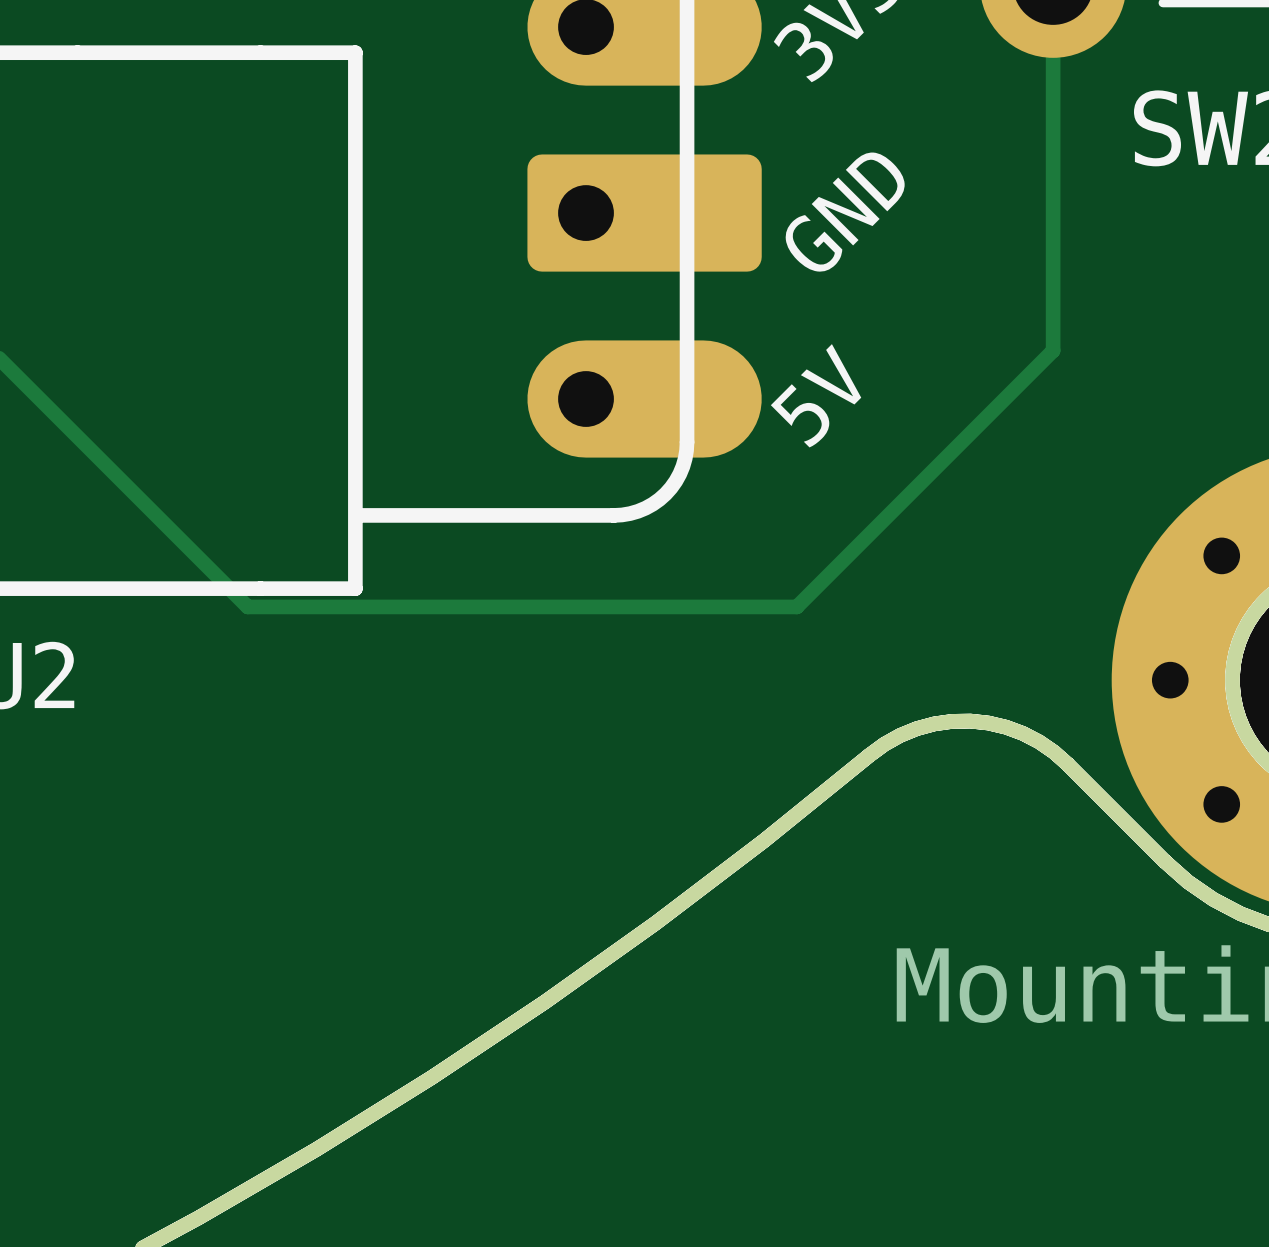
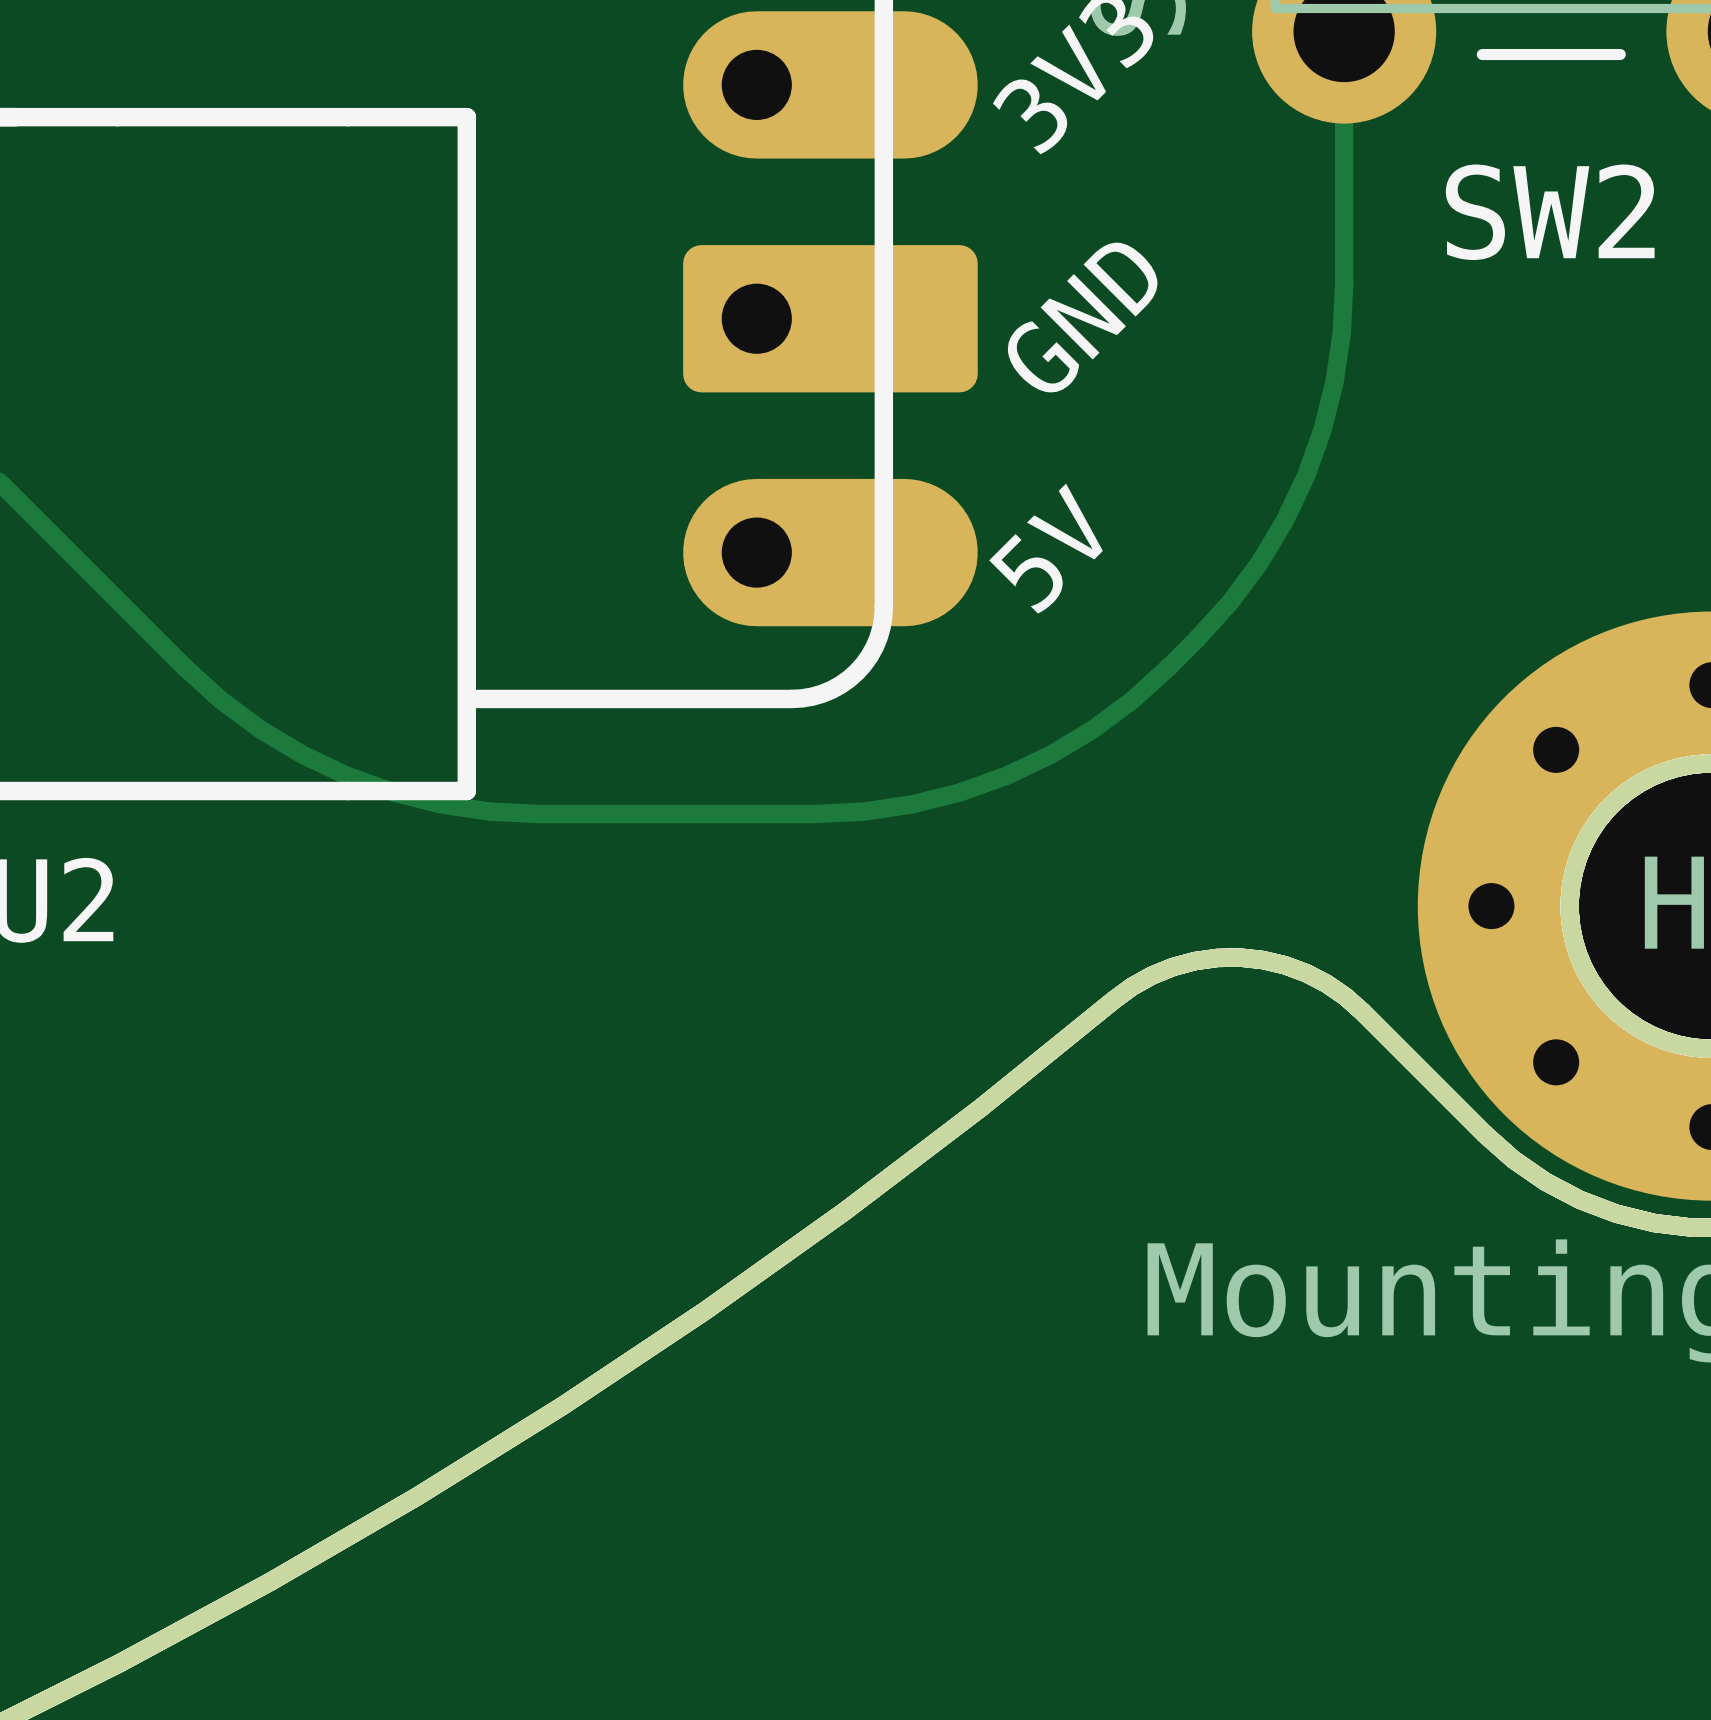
track: (1053, 185) (1053, 350) (936, 467) -> (1344, 284) (1341, 333) (1334, 382) (1322, 429) (1306, 476) (1285, 520) (1259, 562) (1230, 602) (1197, 638)
track: (131, 490) (247, 606) (412, 606) -> (184, 667) (221, 700) (260, 729) (302, 754) (347, 775) (393, 792) (441, 804) (489, 811) (538, 814)
track: (913, 490) (796, 606) (631, 606) -> (1168, 667) (1132, 700) (1092, 729) (1050, 754) (1006, 775) (959, 792) (912, 804) (863, 811) (814, 814)

